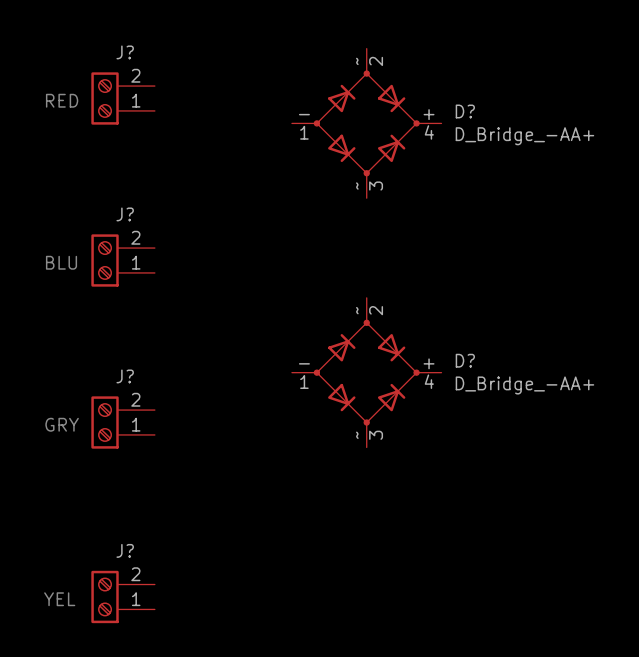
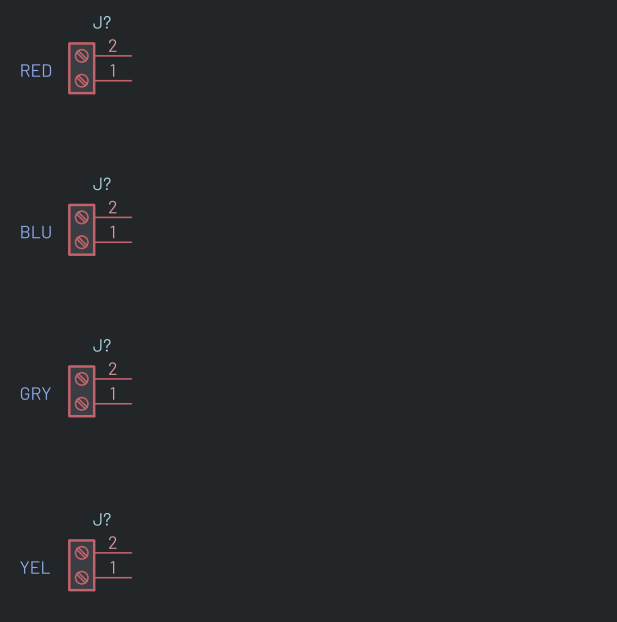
D?: D_Bridge_-AA+ (366, 123) -> none
D?: D_Bridge_-AA+ (366, 372) -> none

